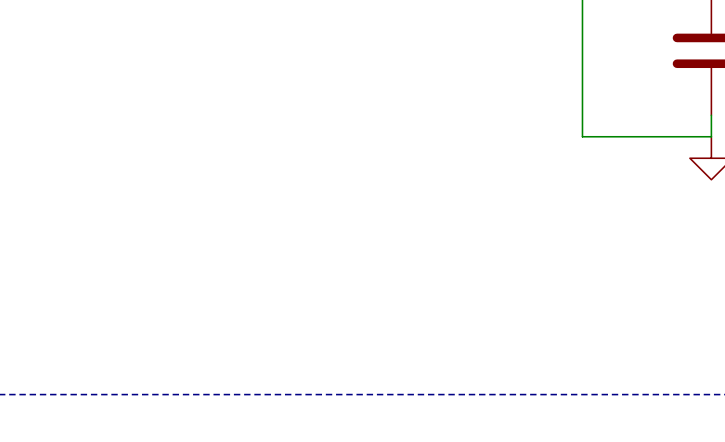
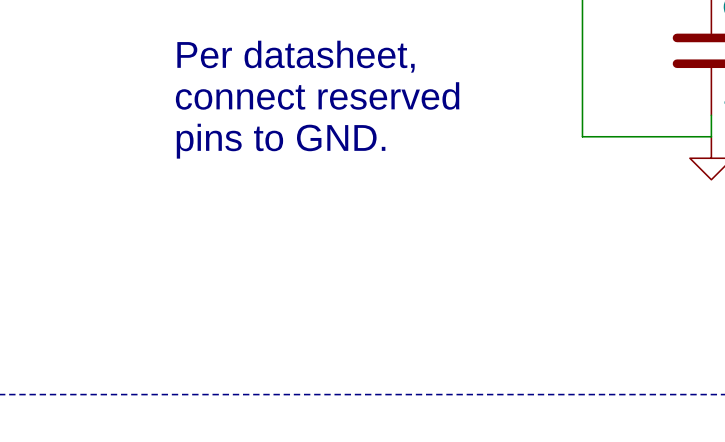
text: none -> Per datasheet, (296, 56)
text: none -> connect reserved (317, 95)
text: none -> pins to GND. (281, 141)

